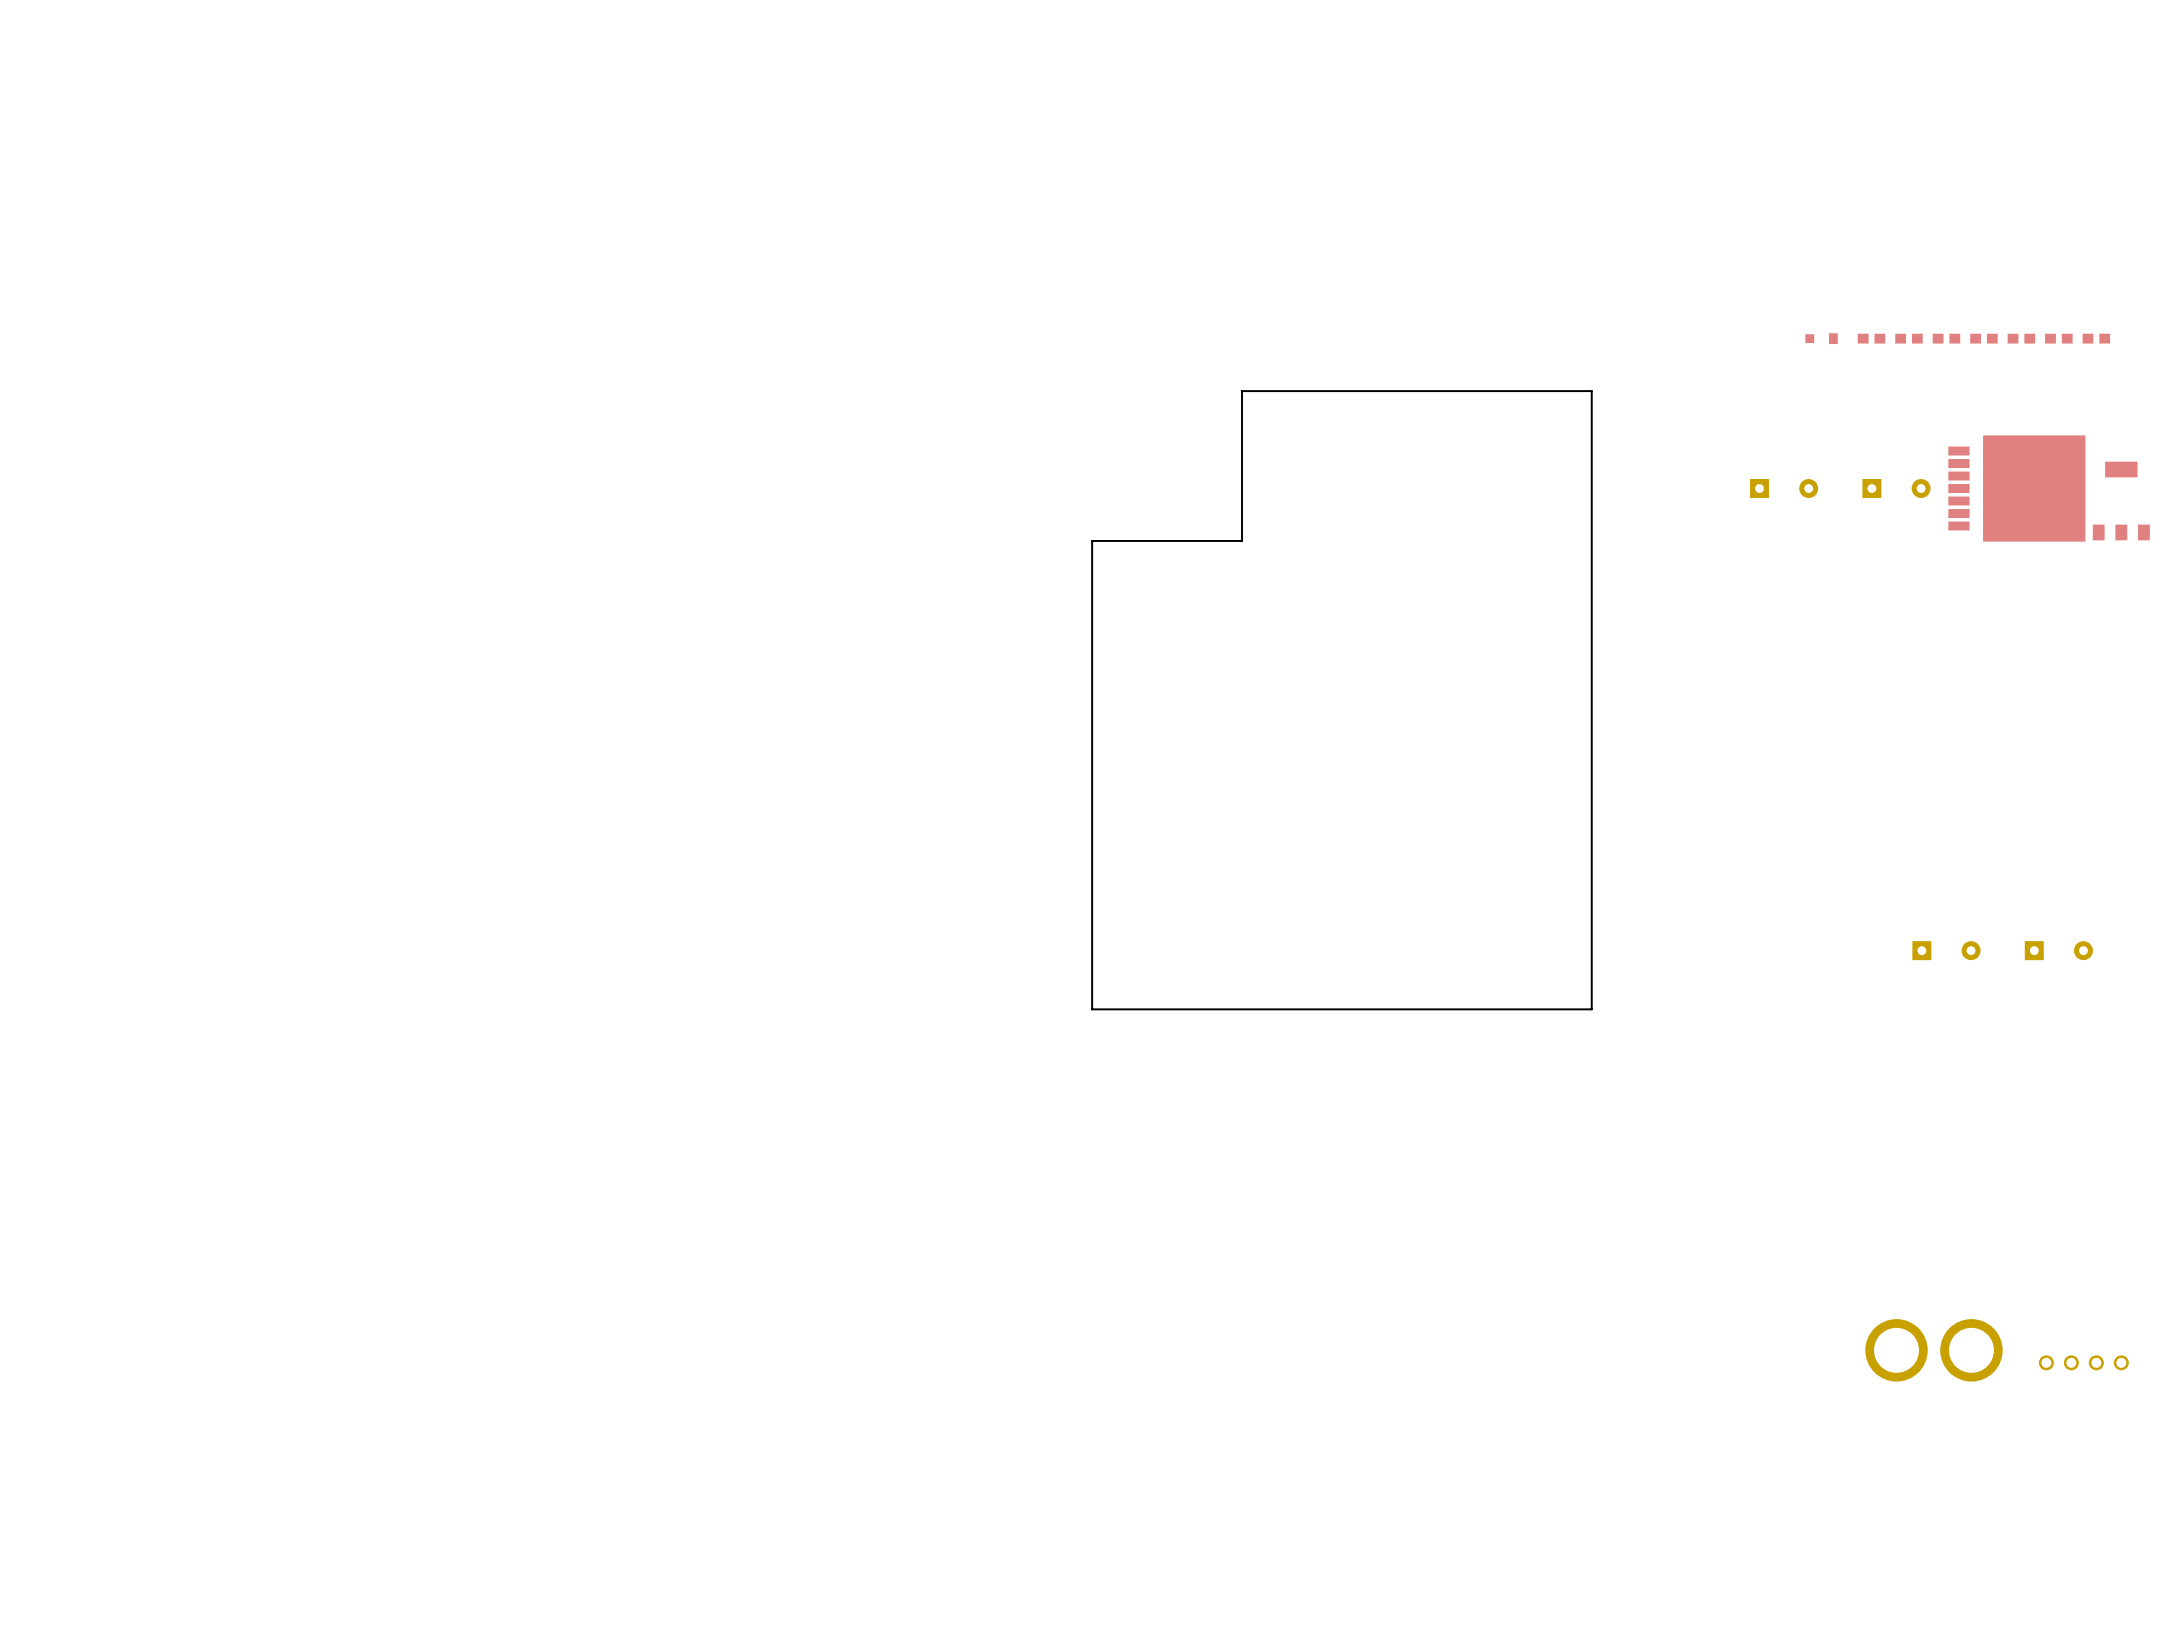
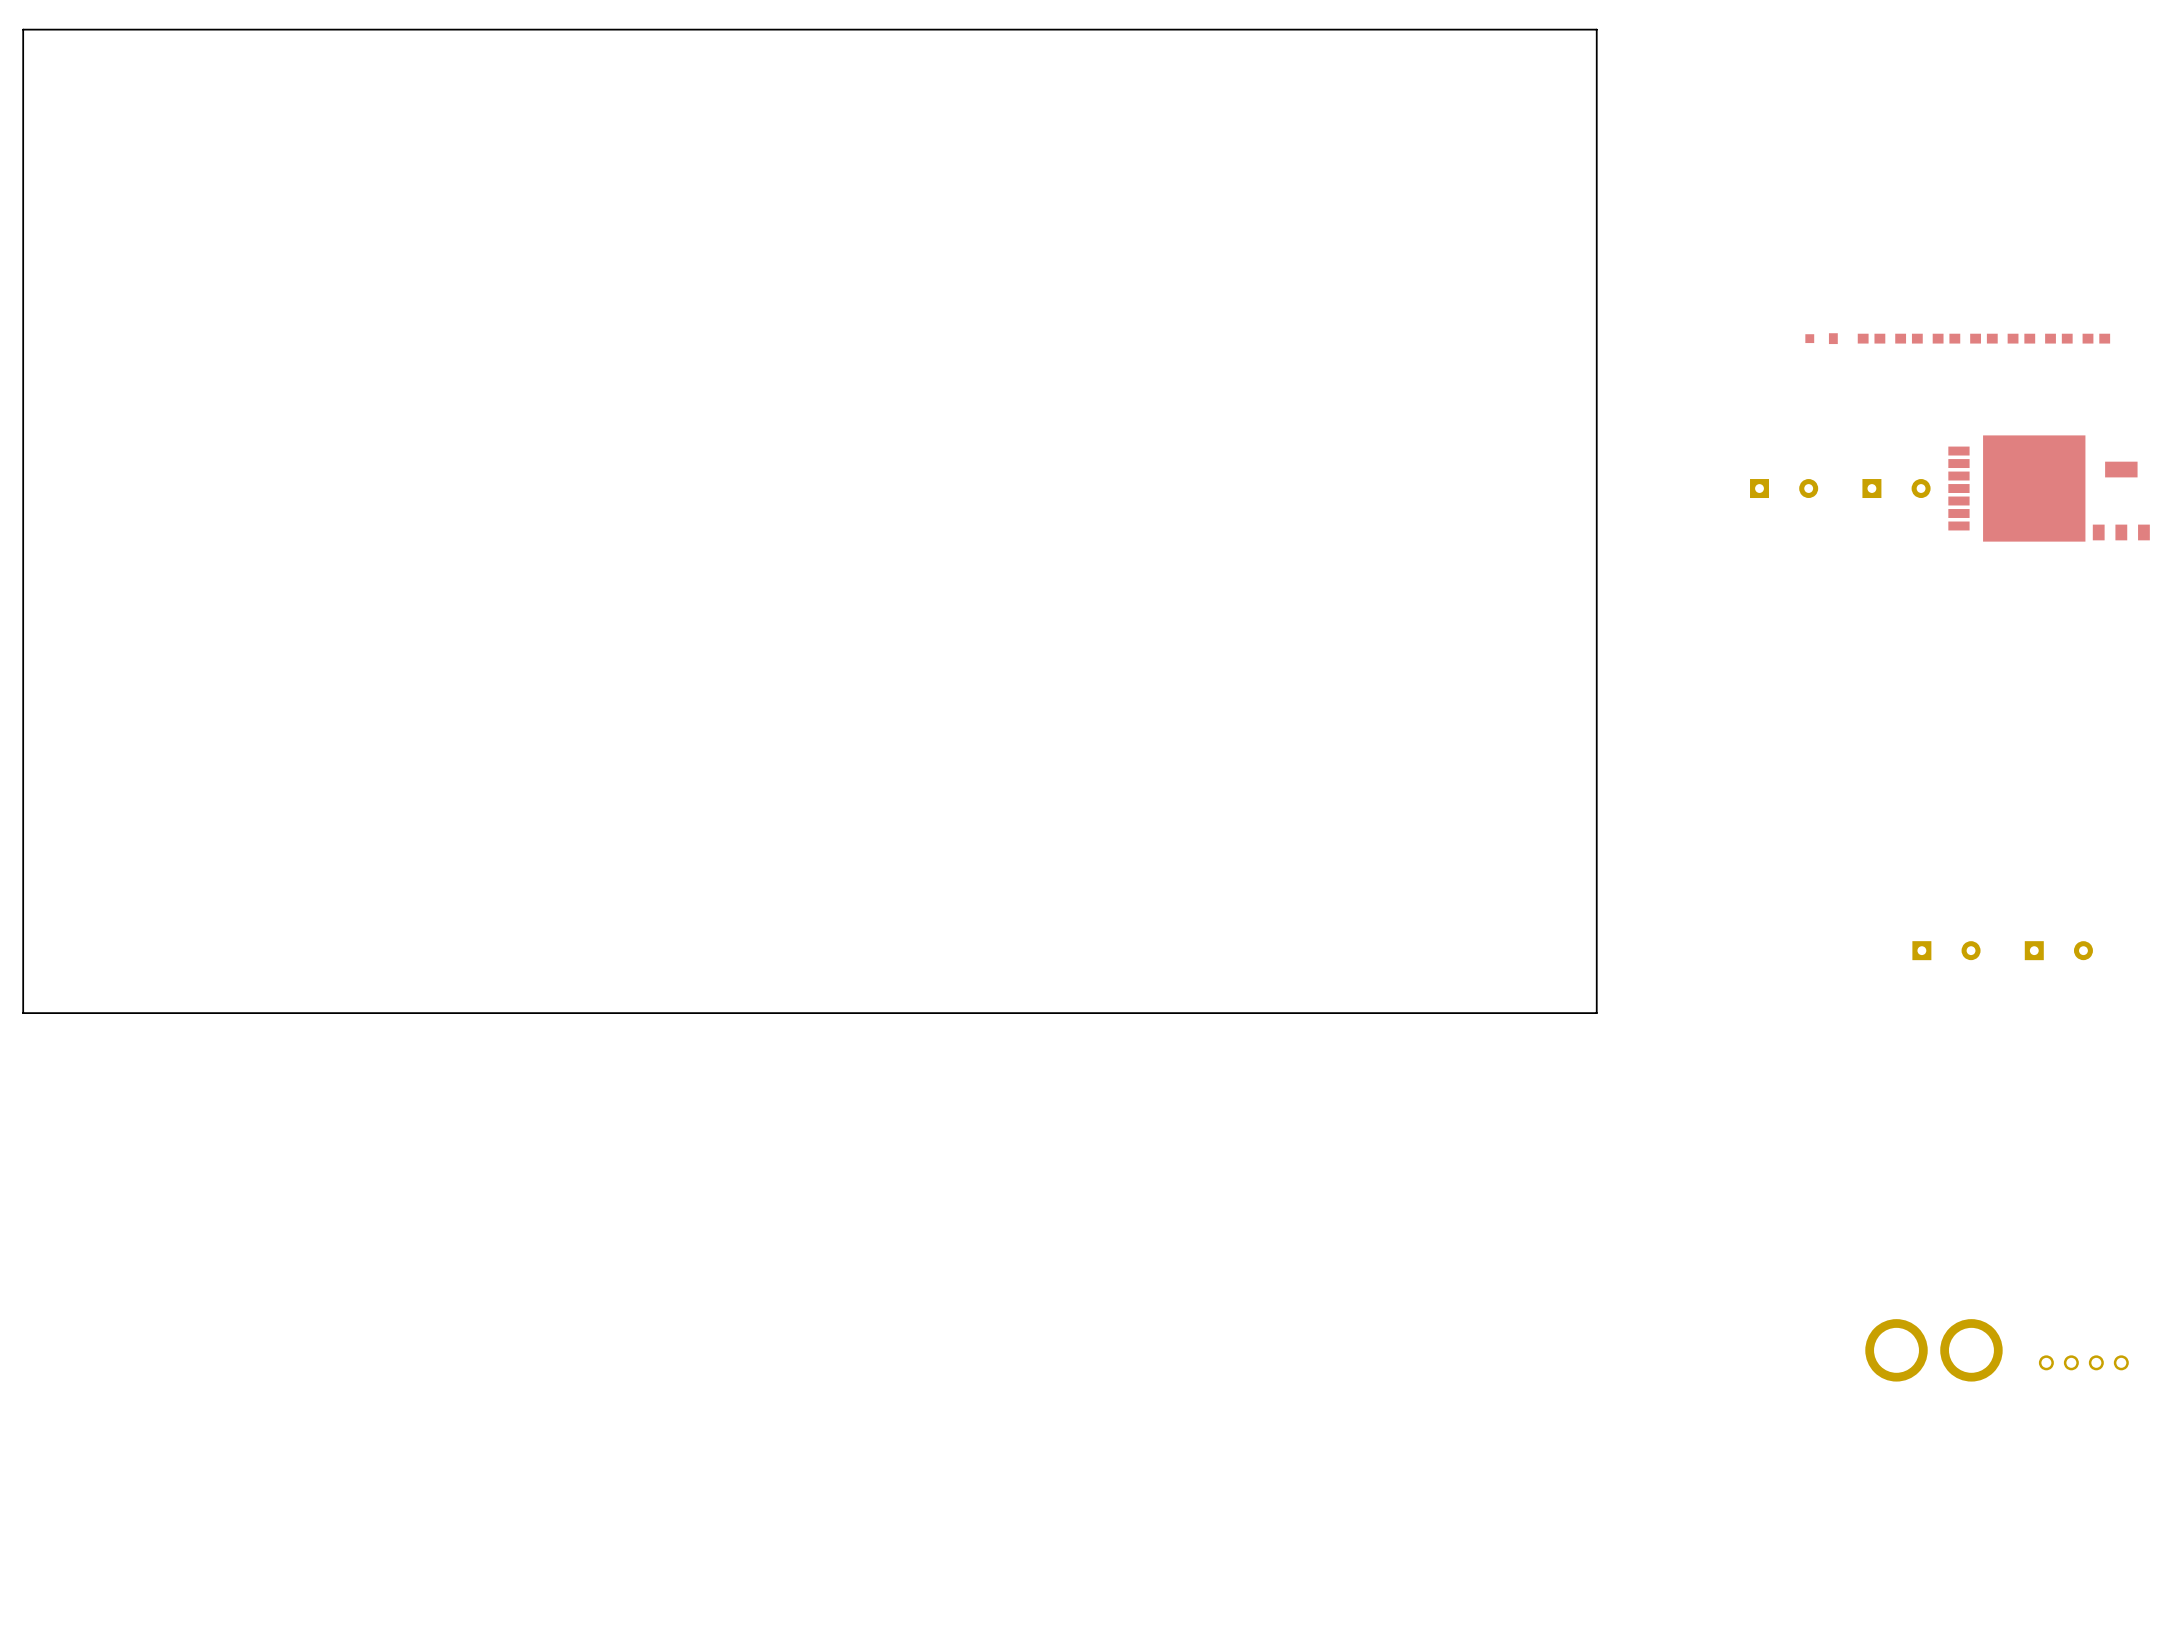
board edge: none -> (1596, 29) (23, 29) (23, 1013) (1596, 1013) (1596, 29)
board edge: (1591, 391) (1242, 391) (1242, 540) (1092, 540) (1092, 1009) (1591, 1009) (1591, 391) -> none

